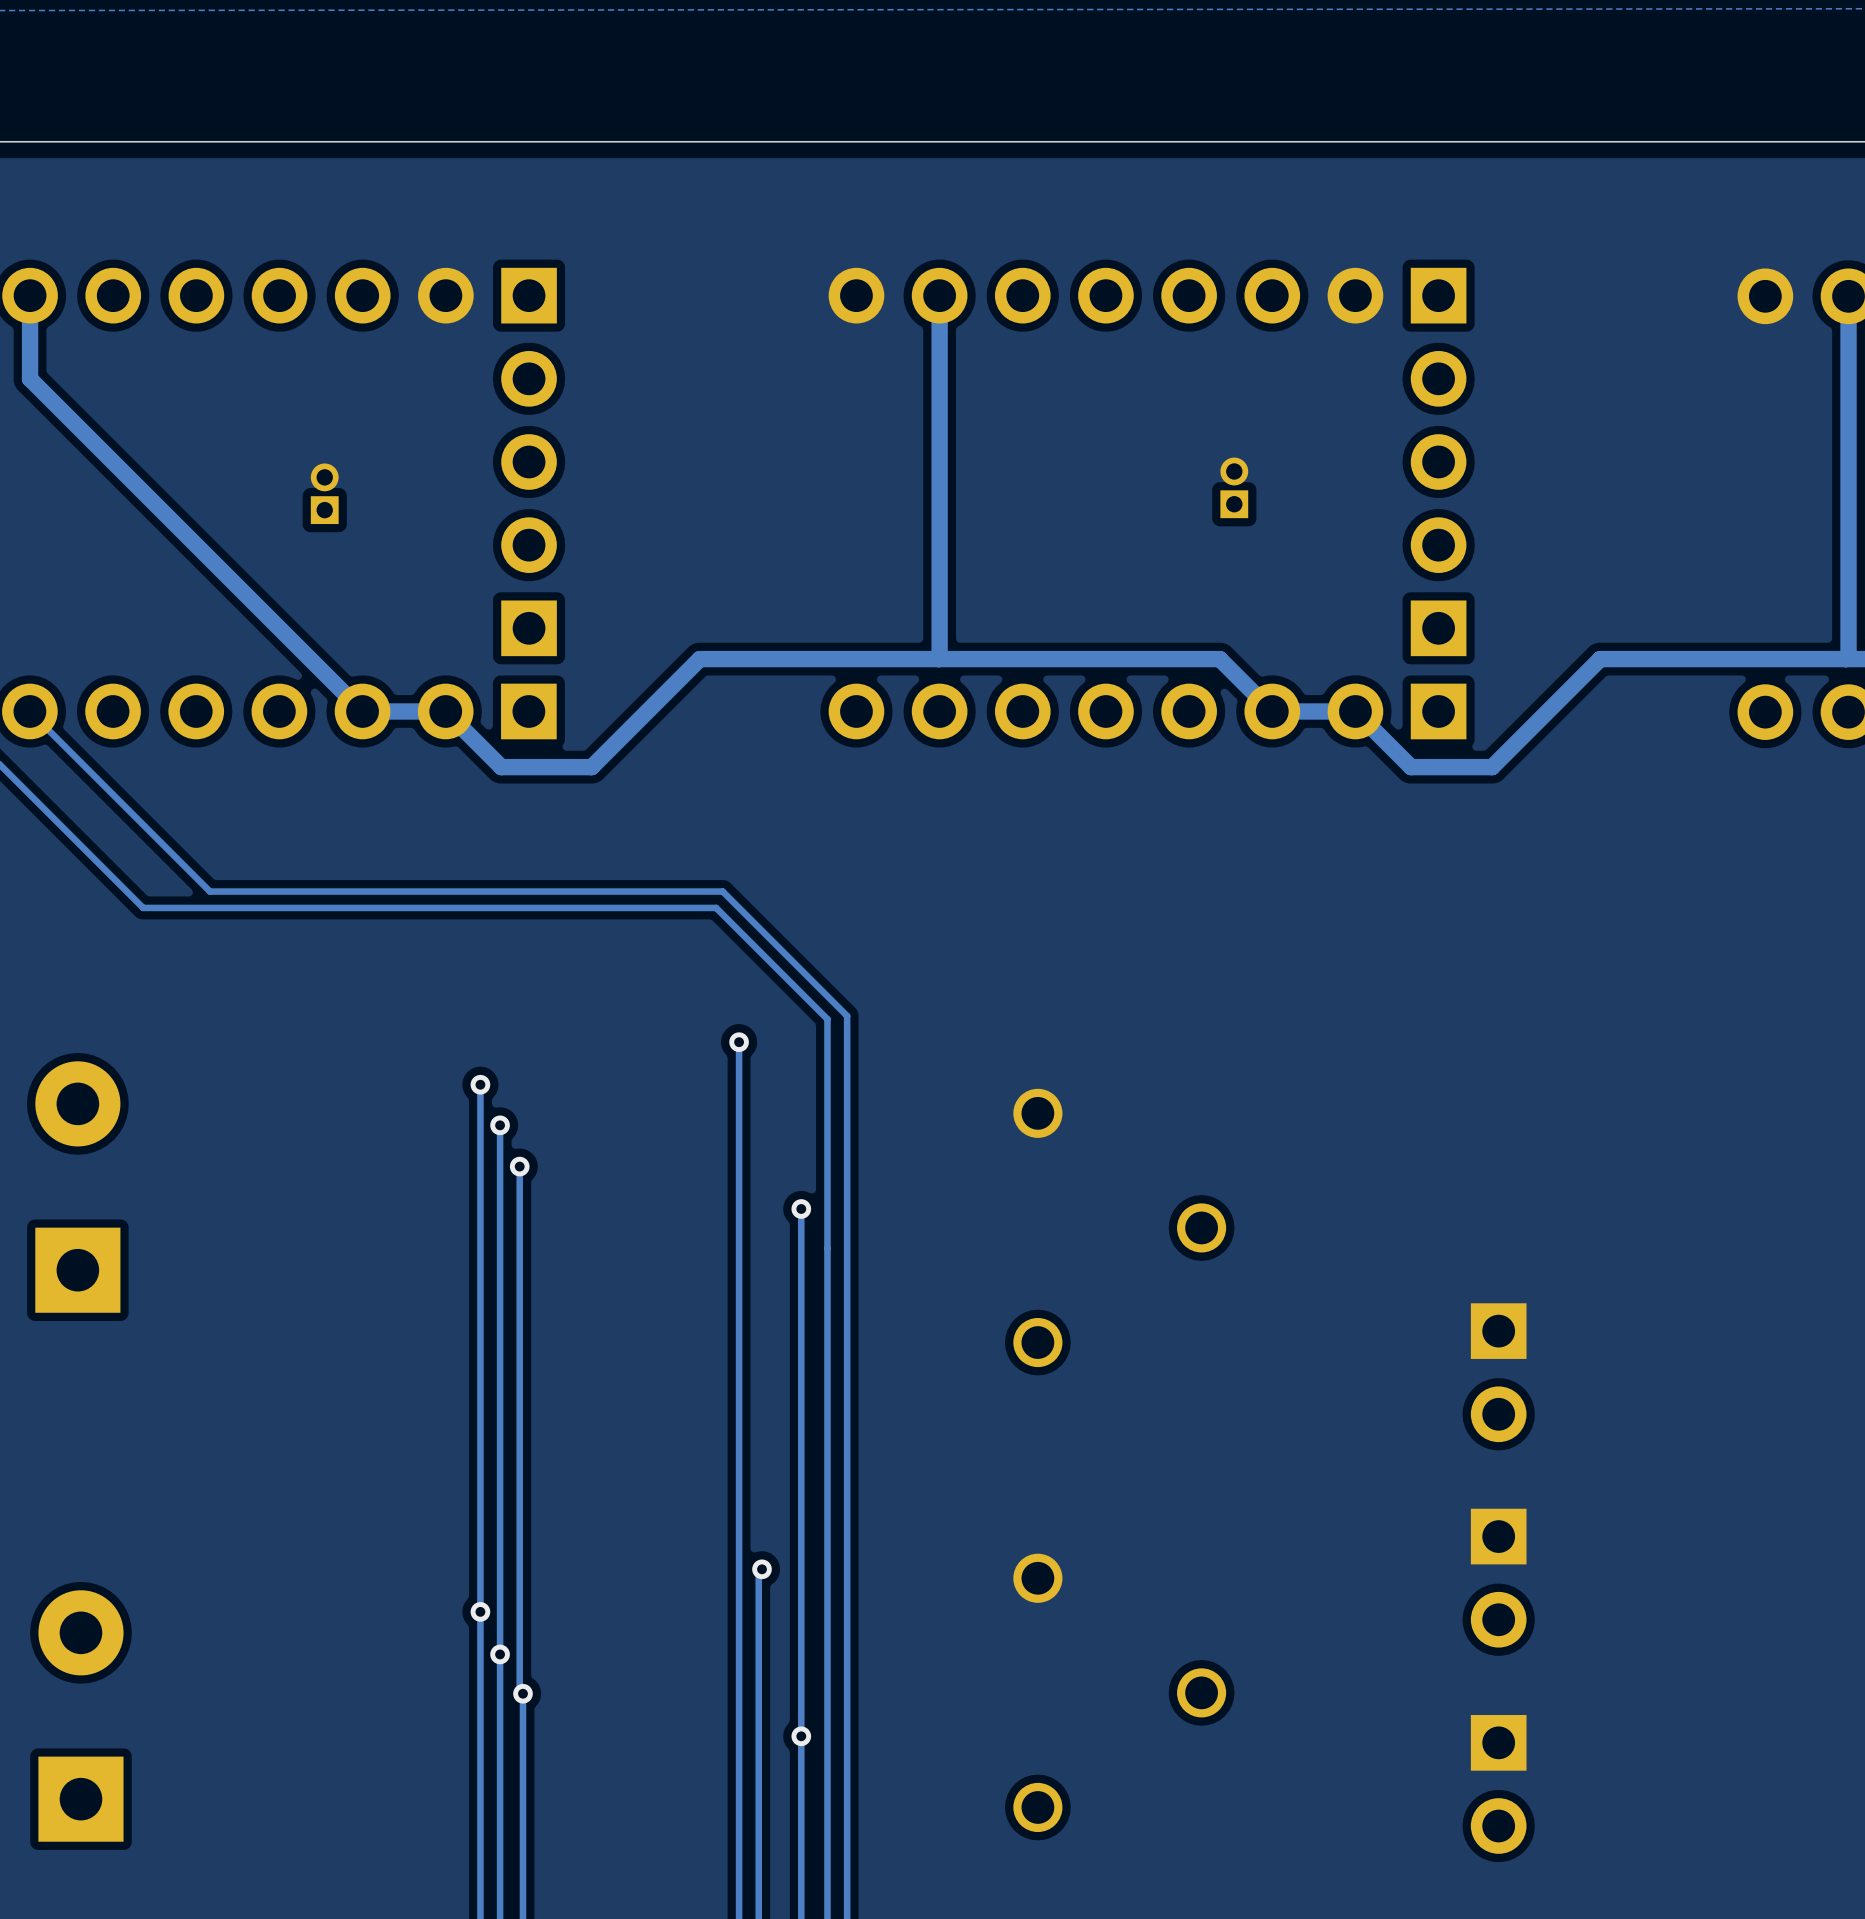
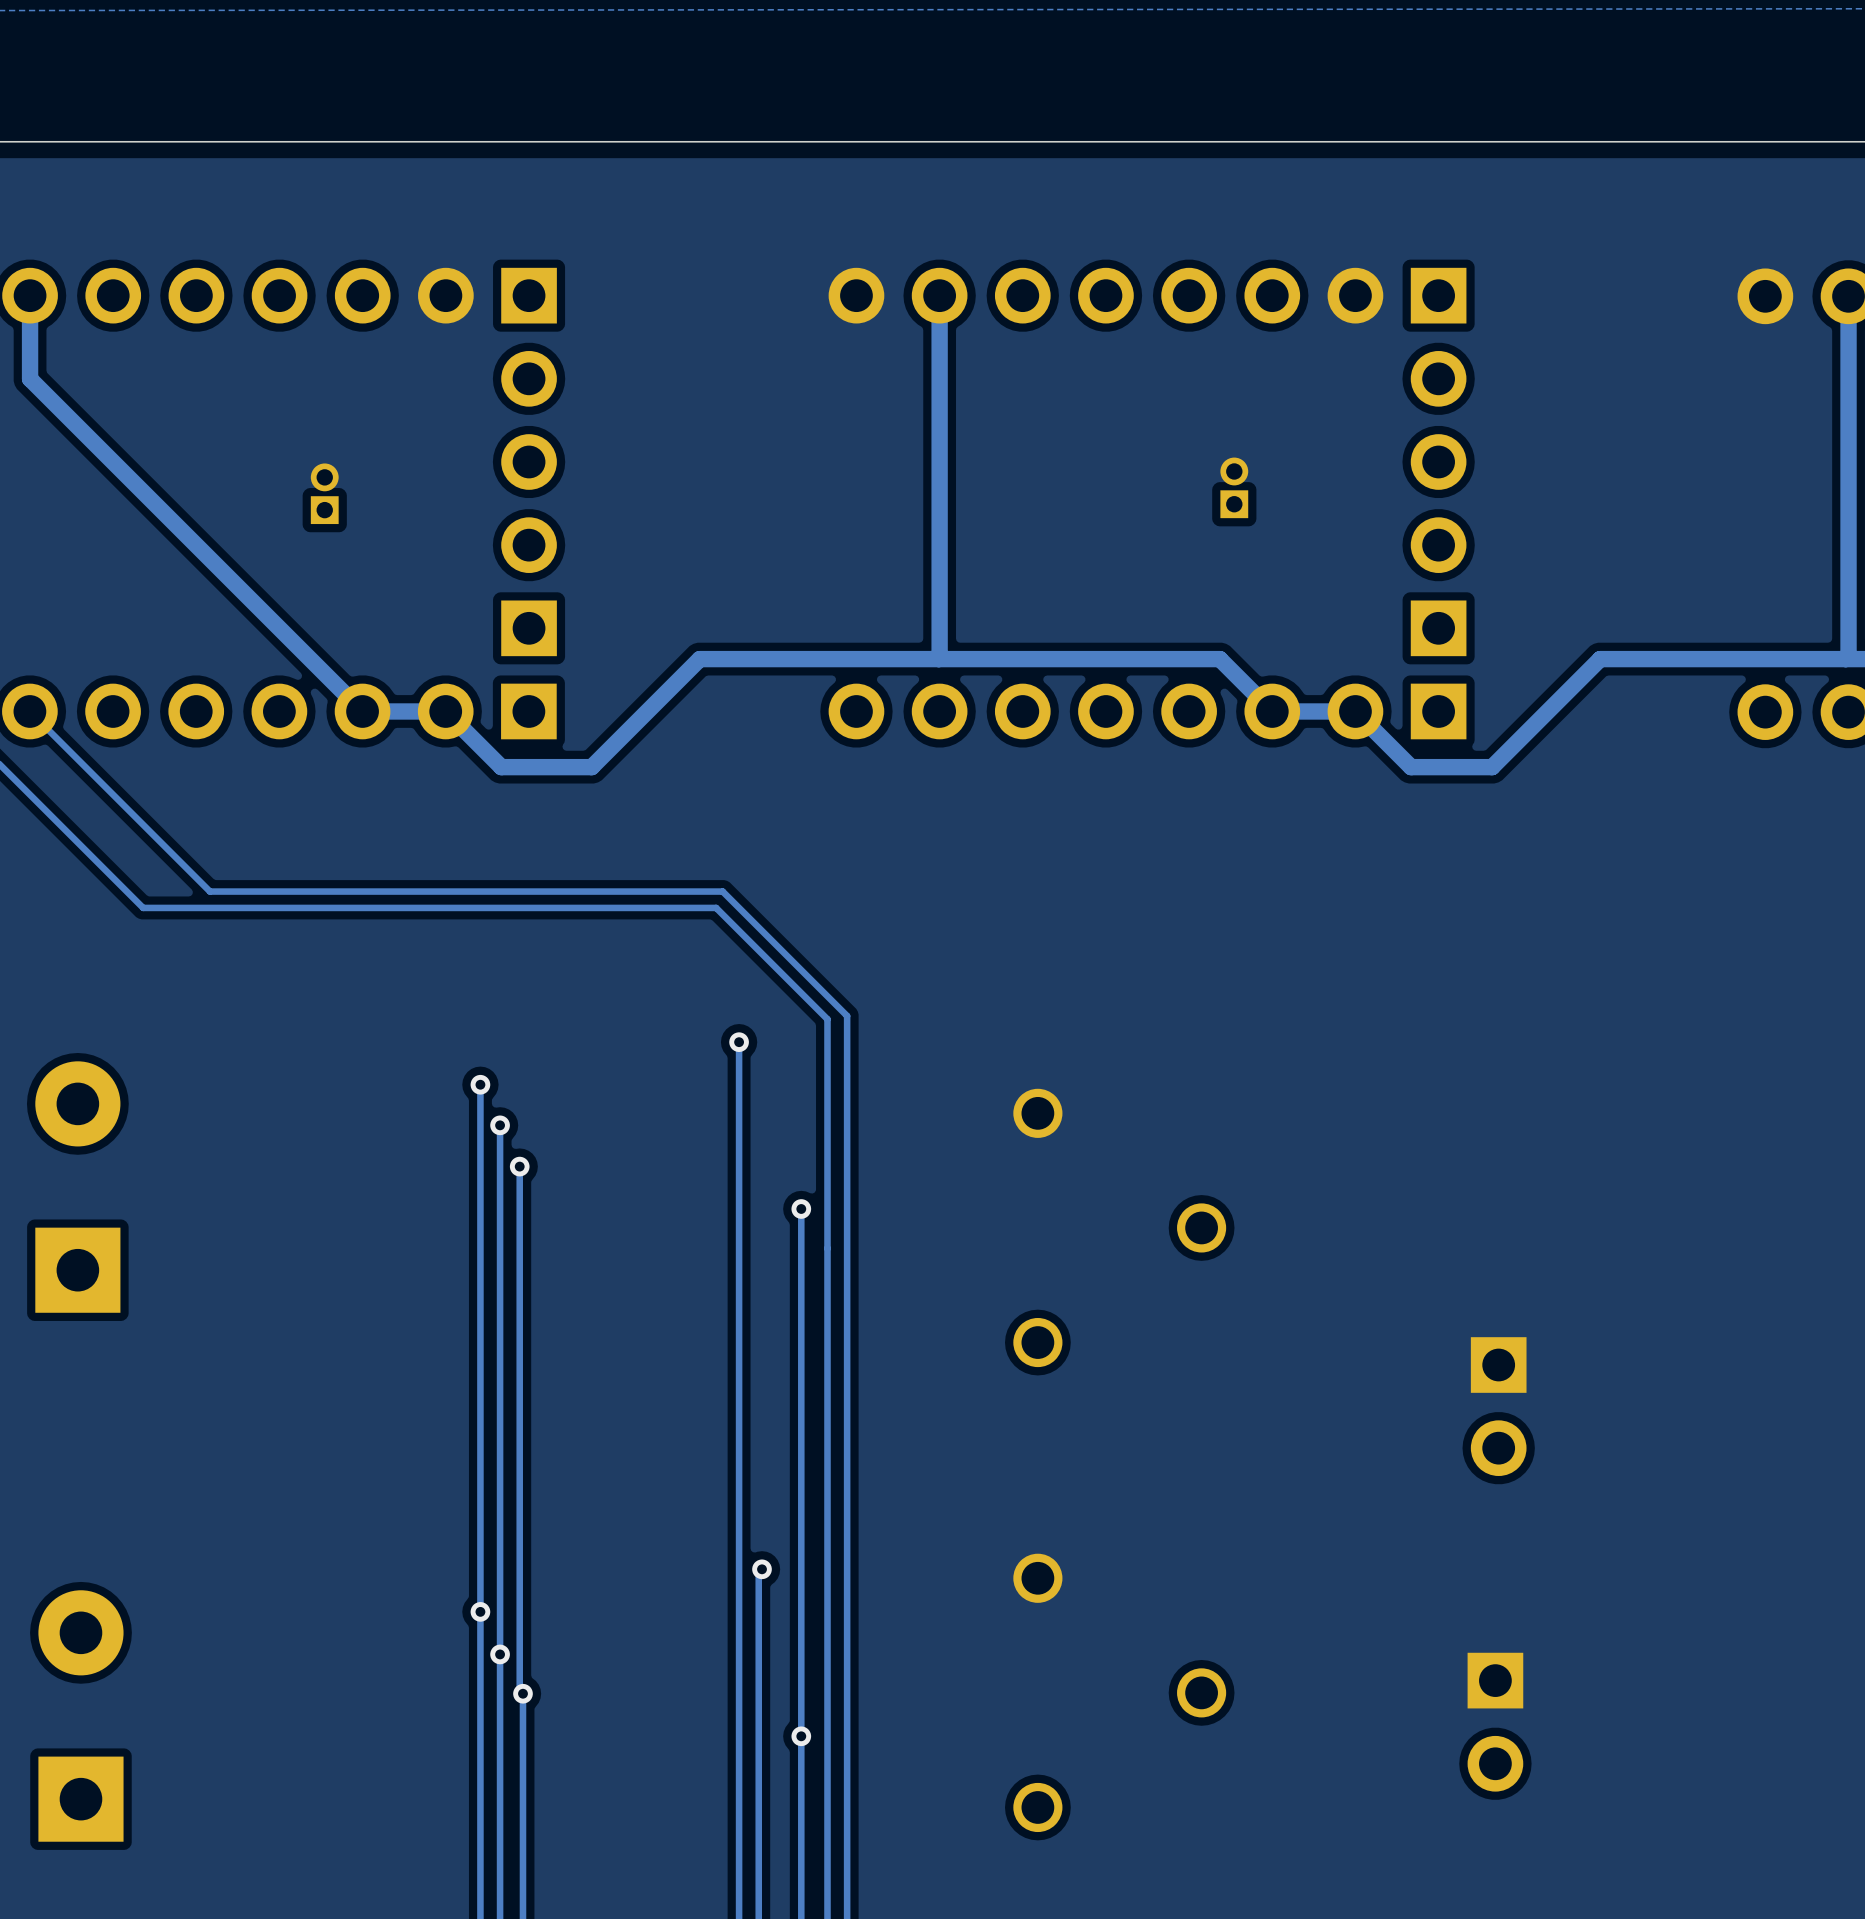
part position: (1498, 1372) -> (1498, 1406)
part: (1498, 1578) -> none
part position: (1498, 1784) -> (1495, 1722)

